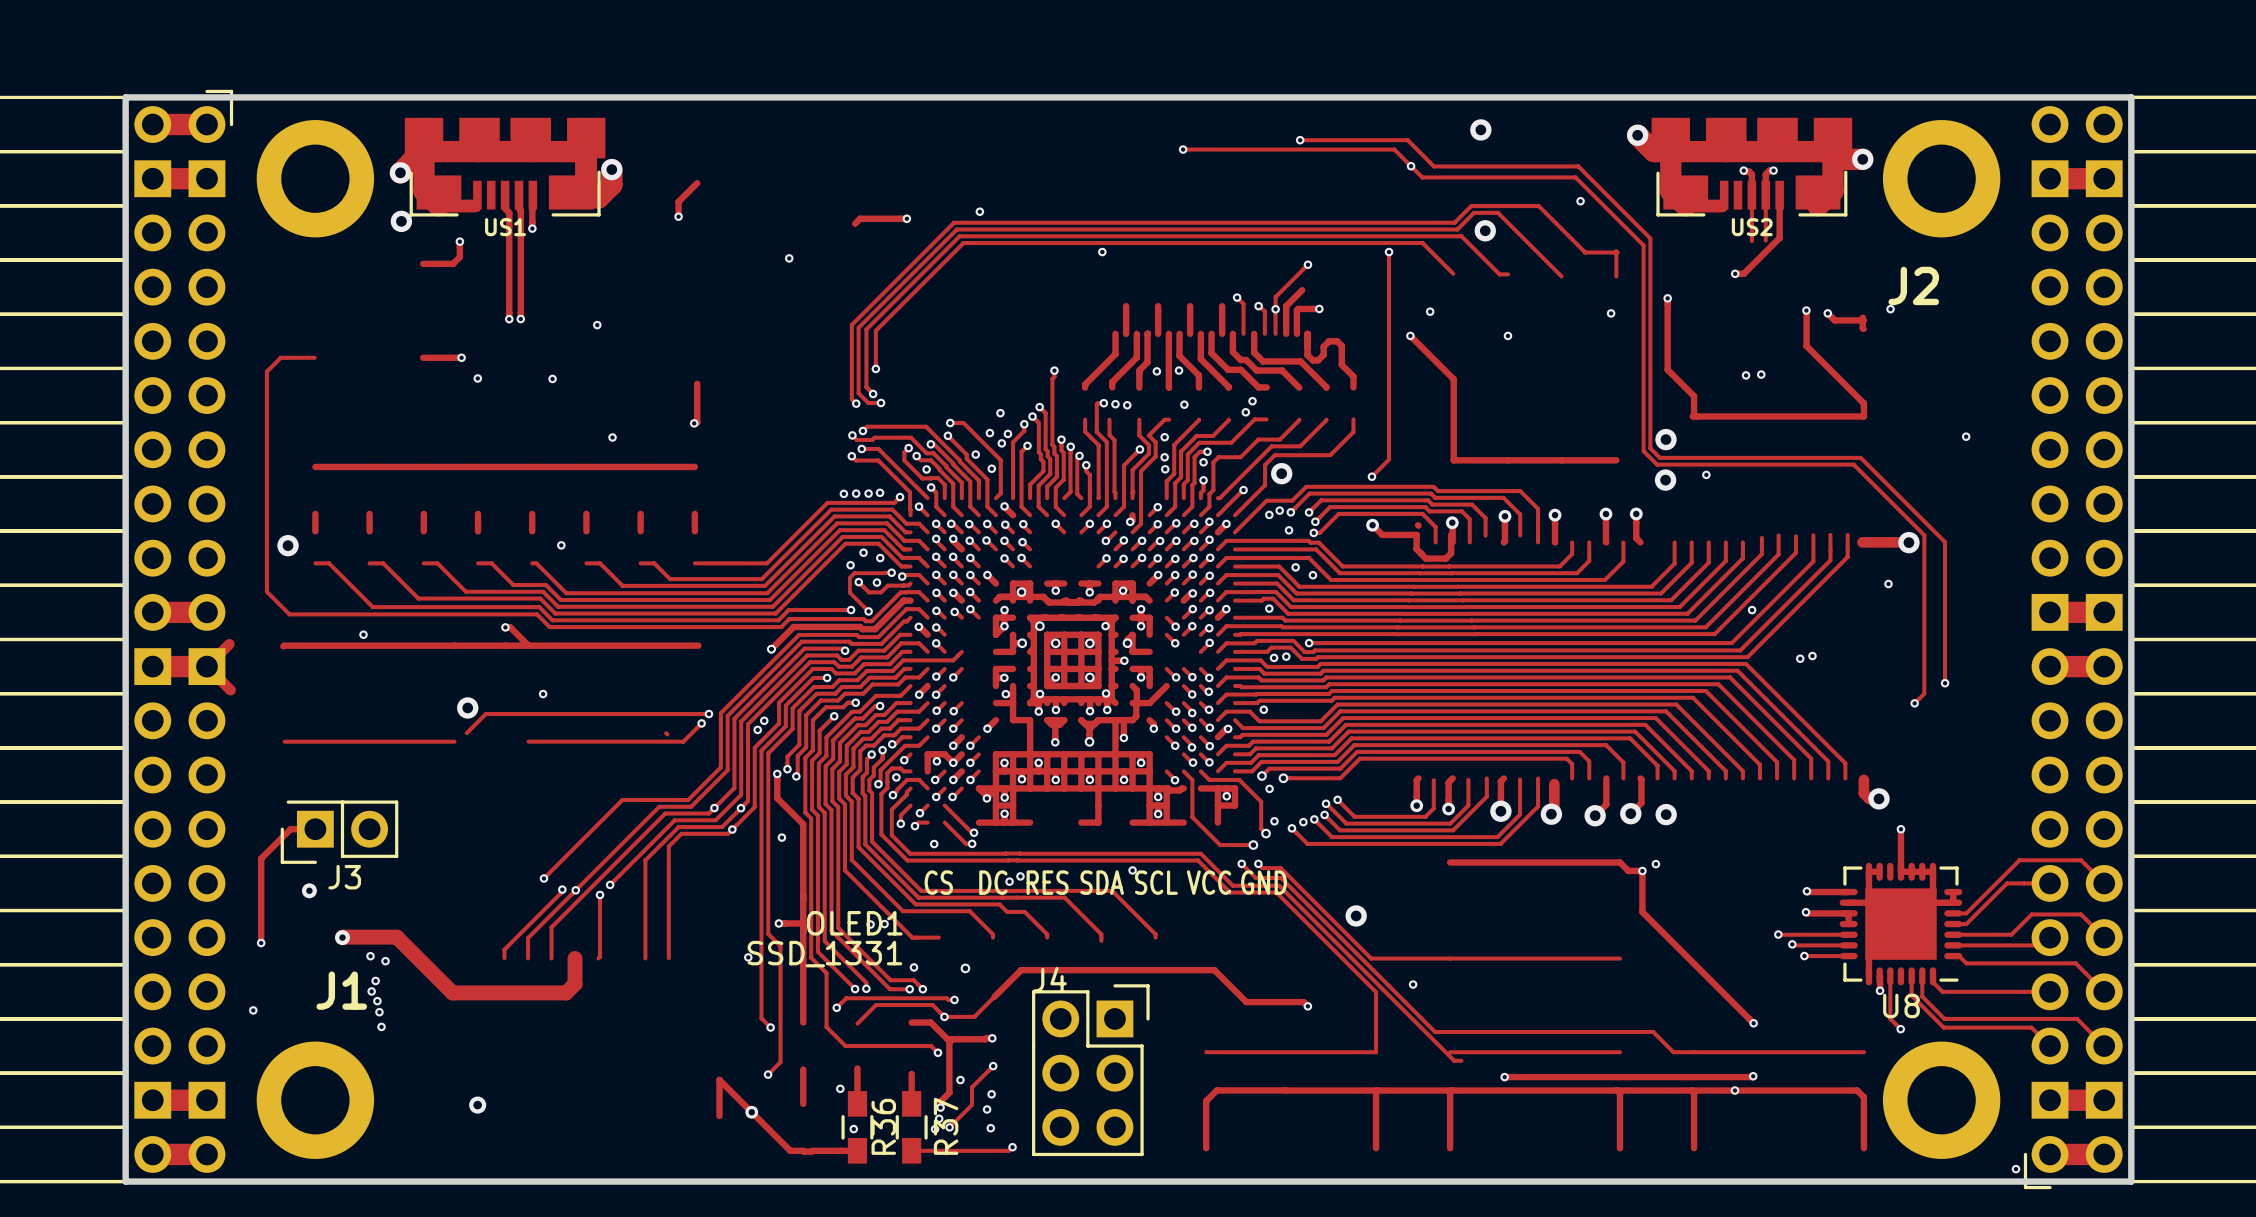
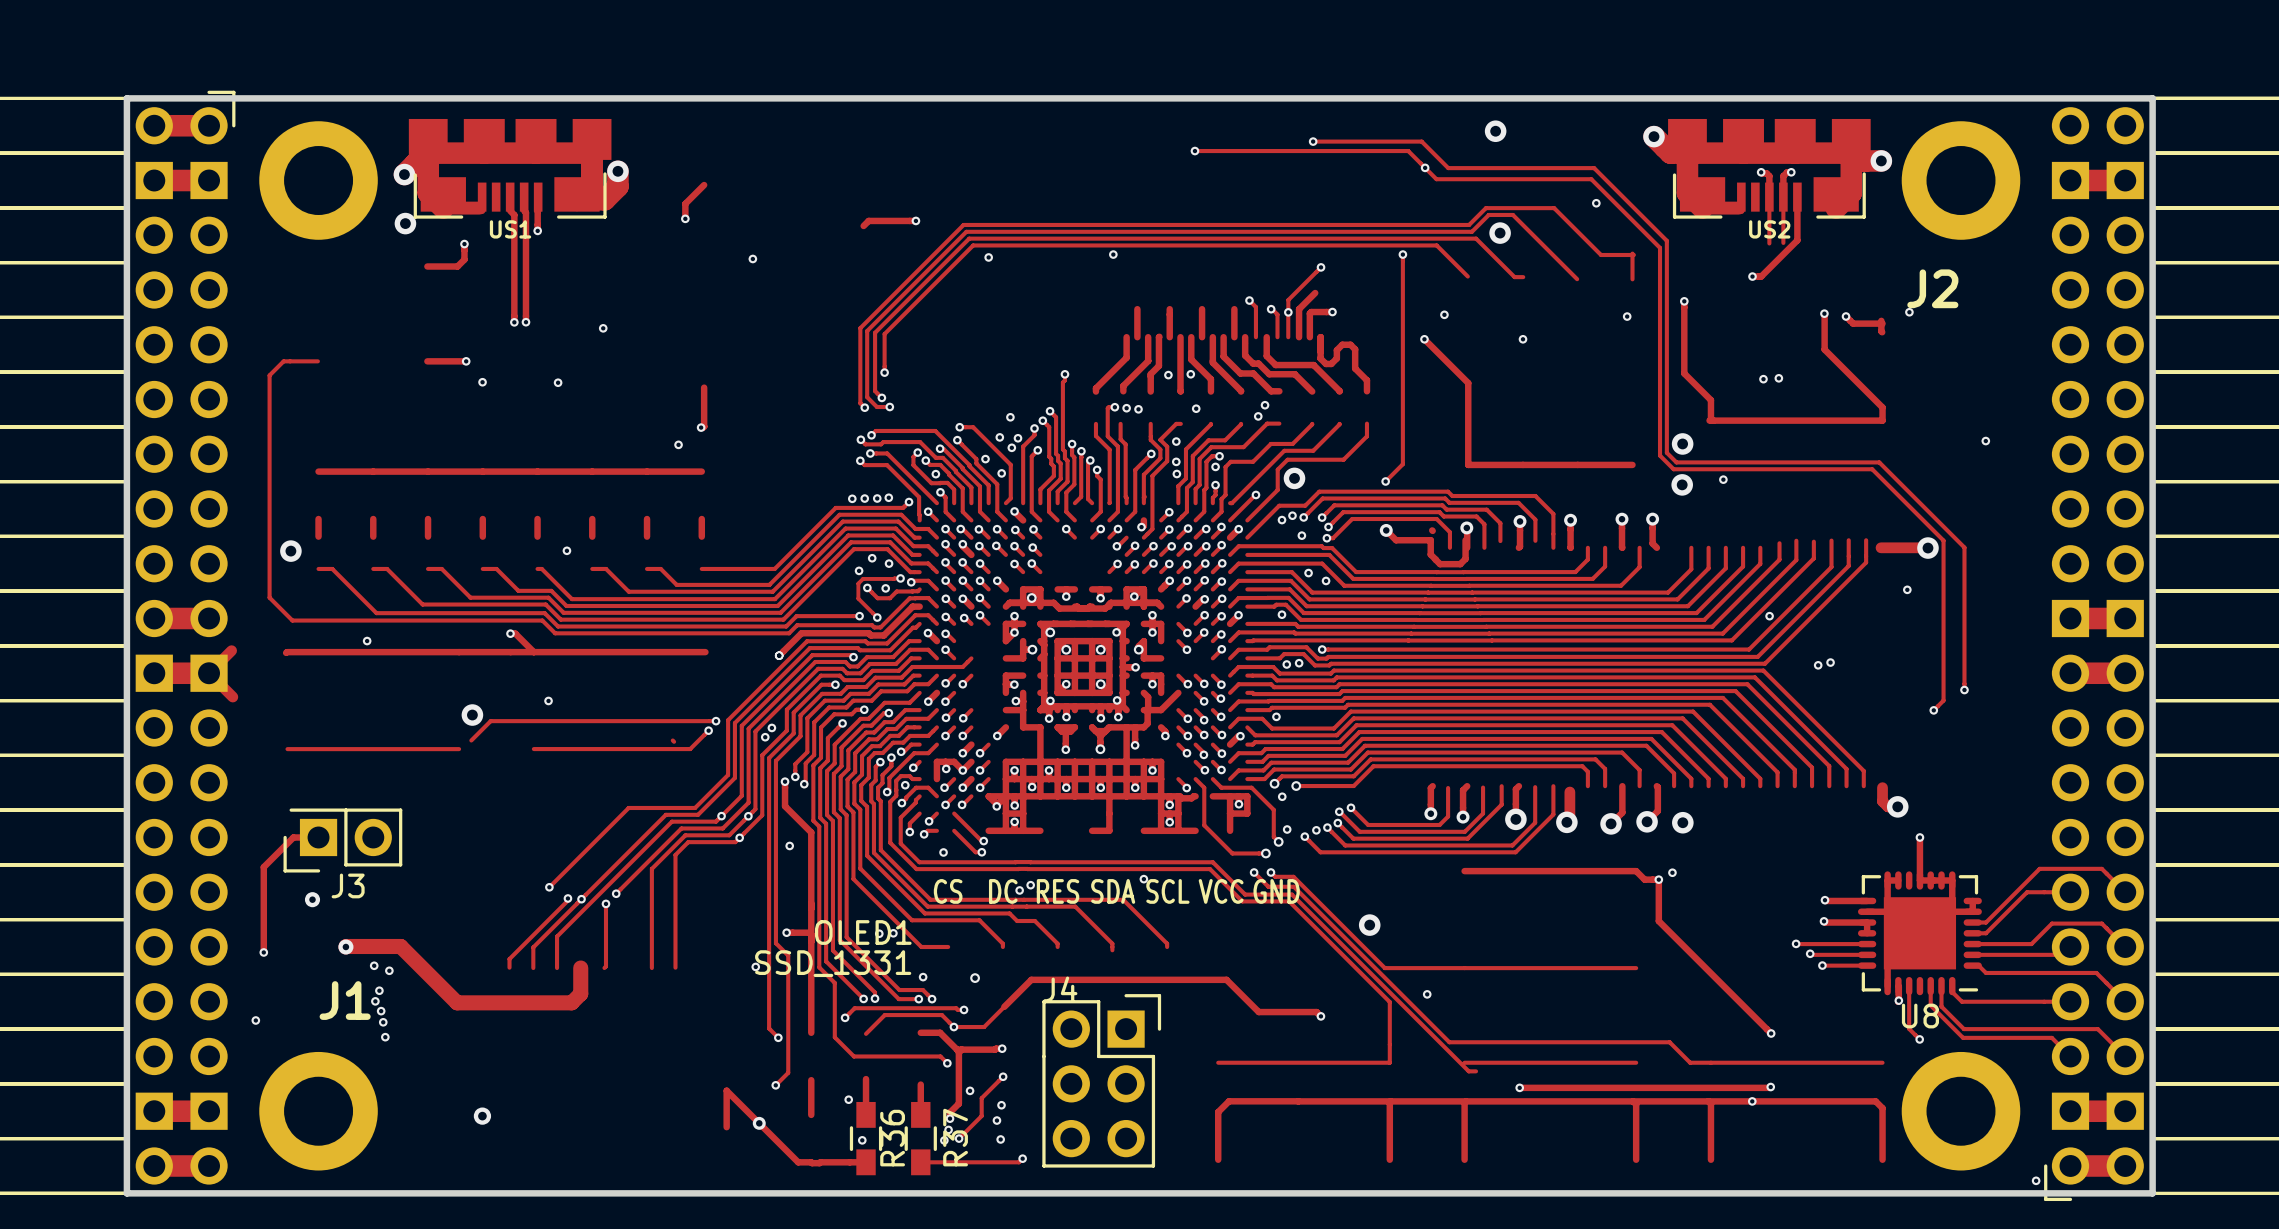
via position: (979, 211) -> (988, 257)
via position: (789, 258) -> (752, 258)
via position: (612, 437) -> (678, 444)

